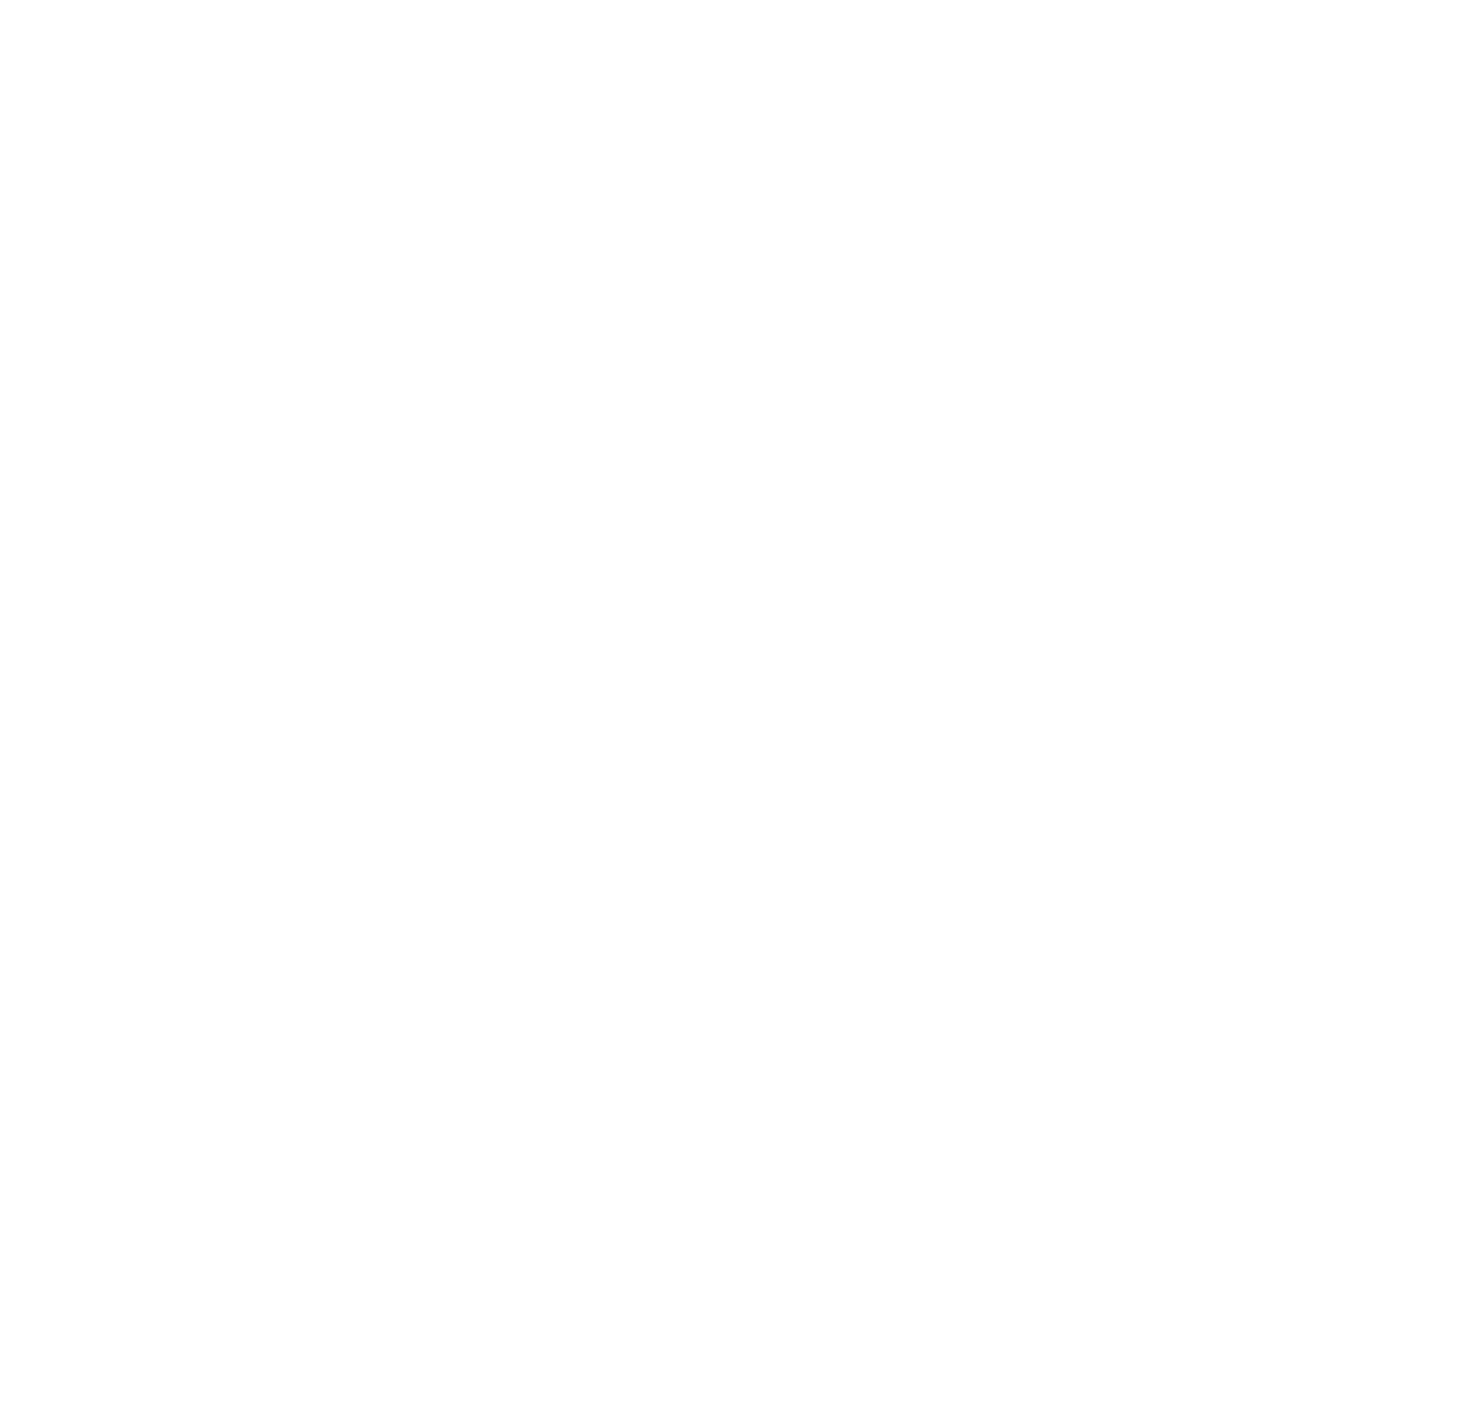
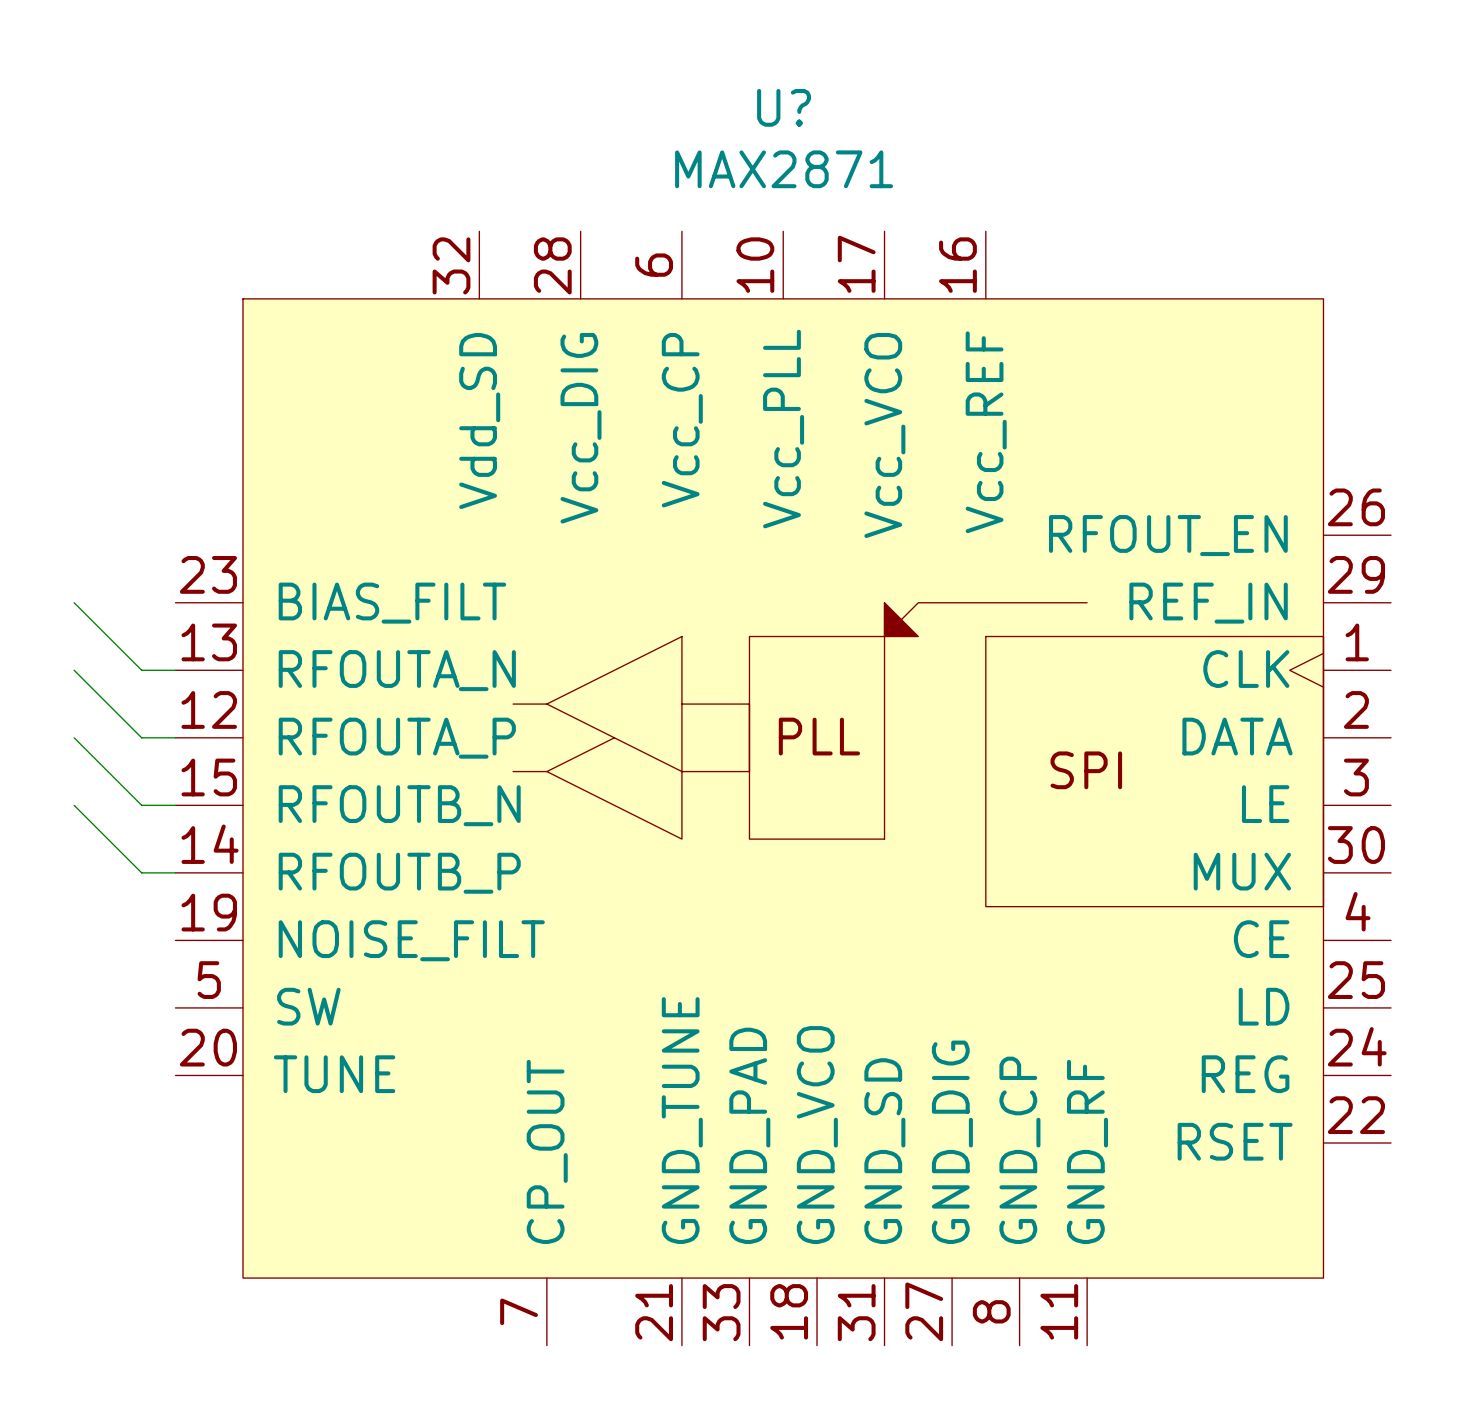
wire: none -> (74, 602) (141, 670) (175, 670)
wire: none -> (74, 670) (141, 737) (175, 737)
wire: none -> (74, 737) (141, 805) (175, 805)
U?: none -> MAX2871 (783, 788)
wire: none -> (74, 805) (141, 872) (175, 872)

